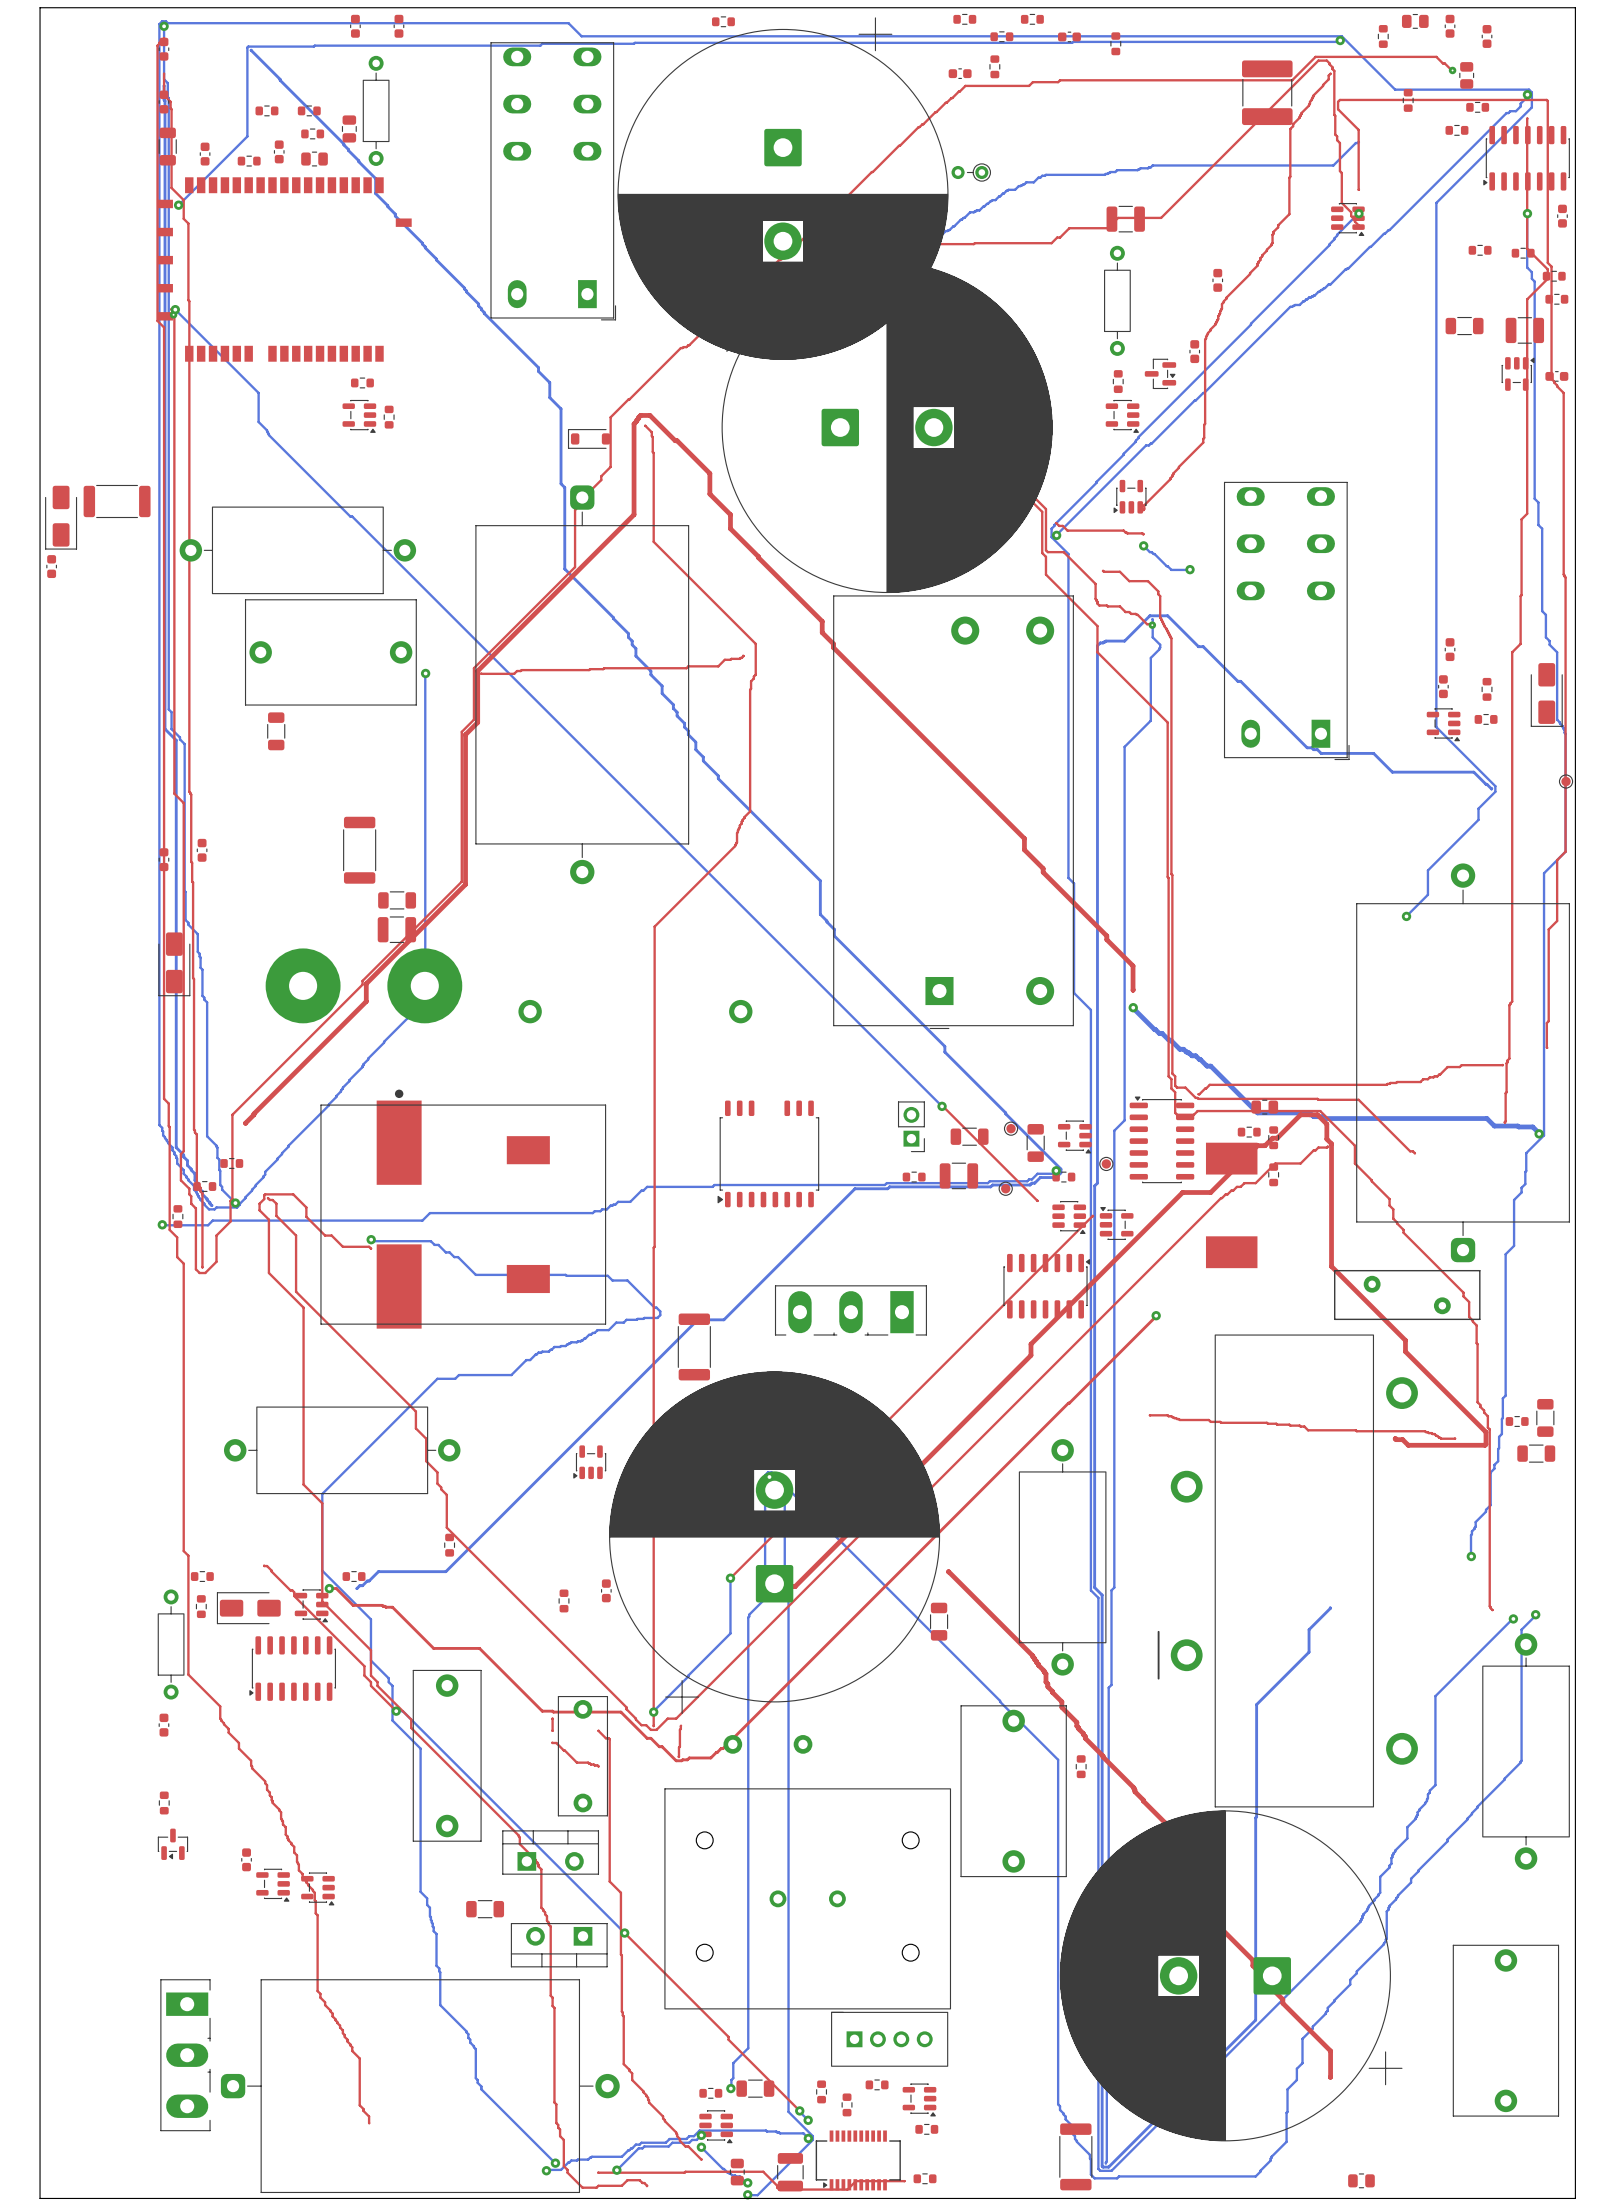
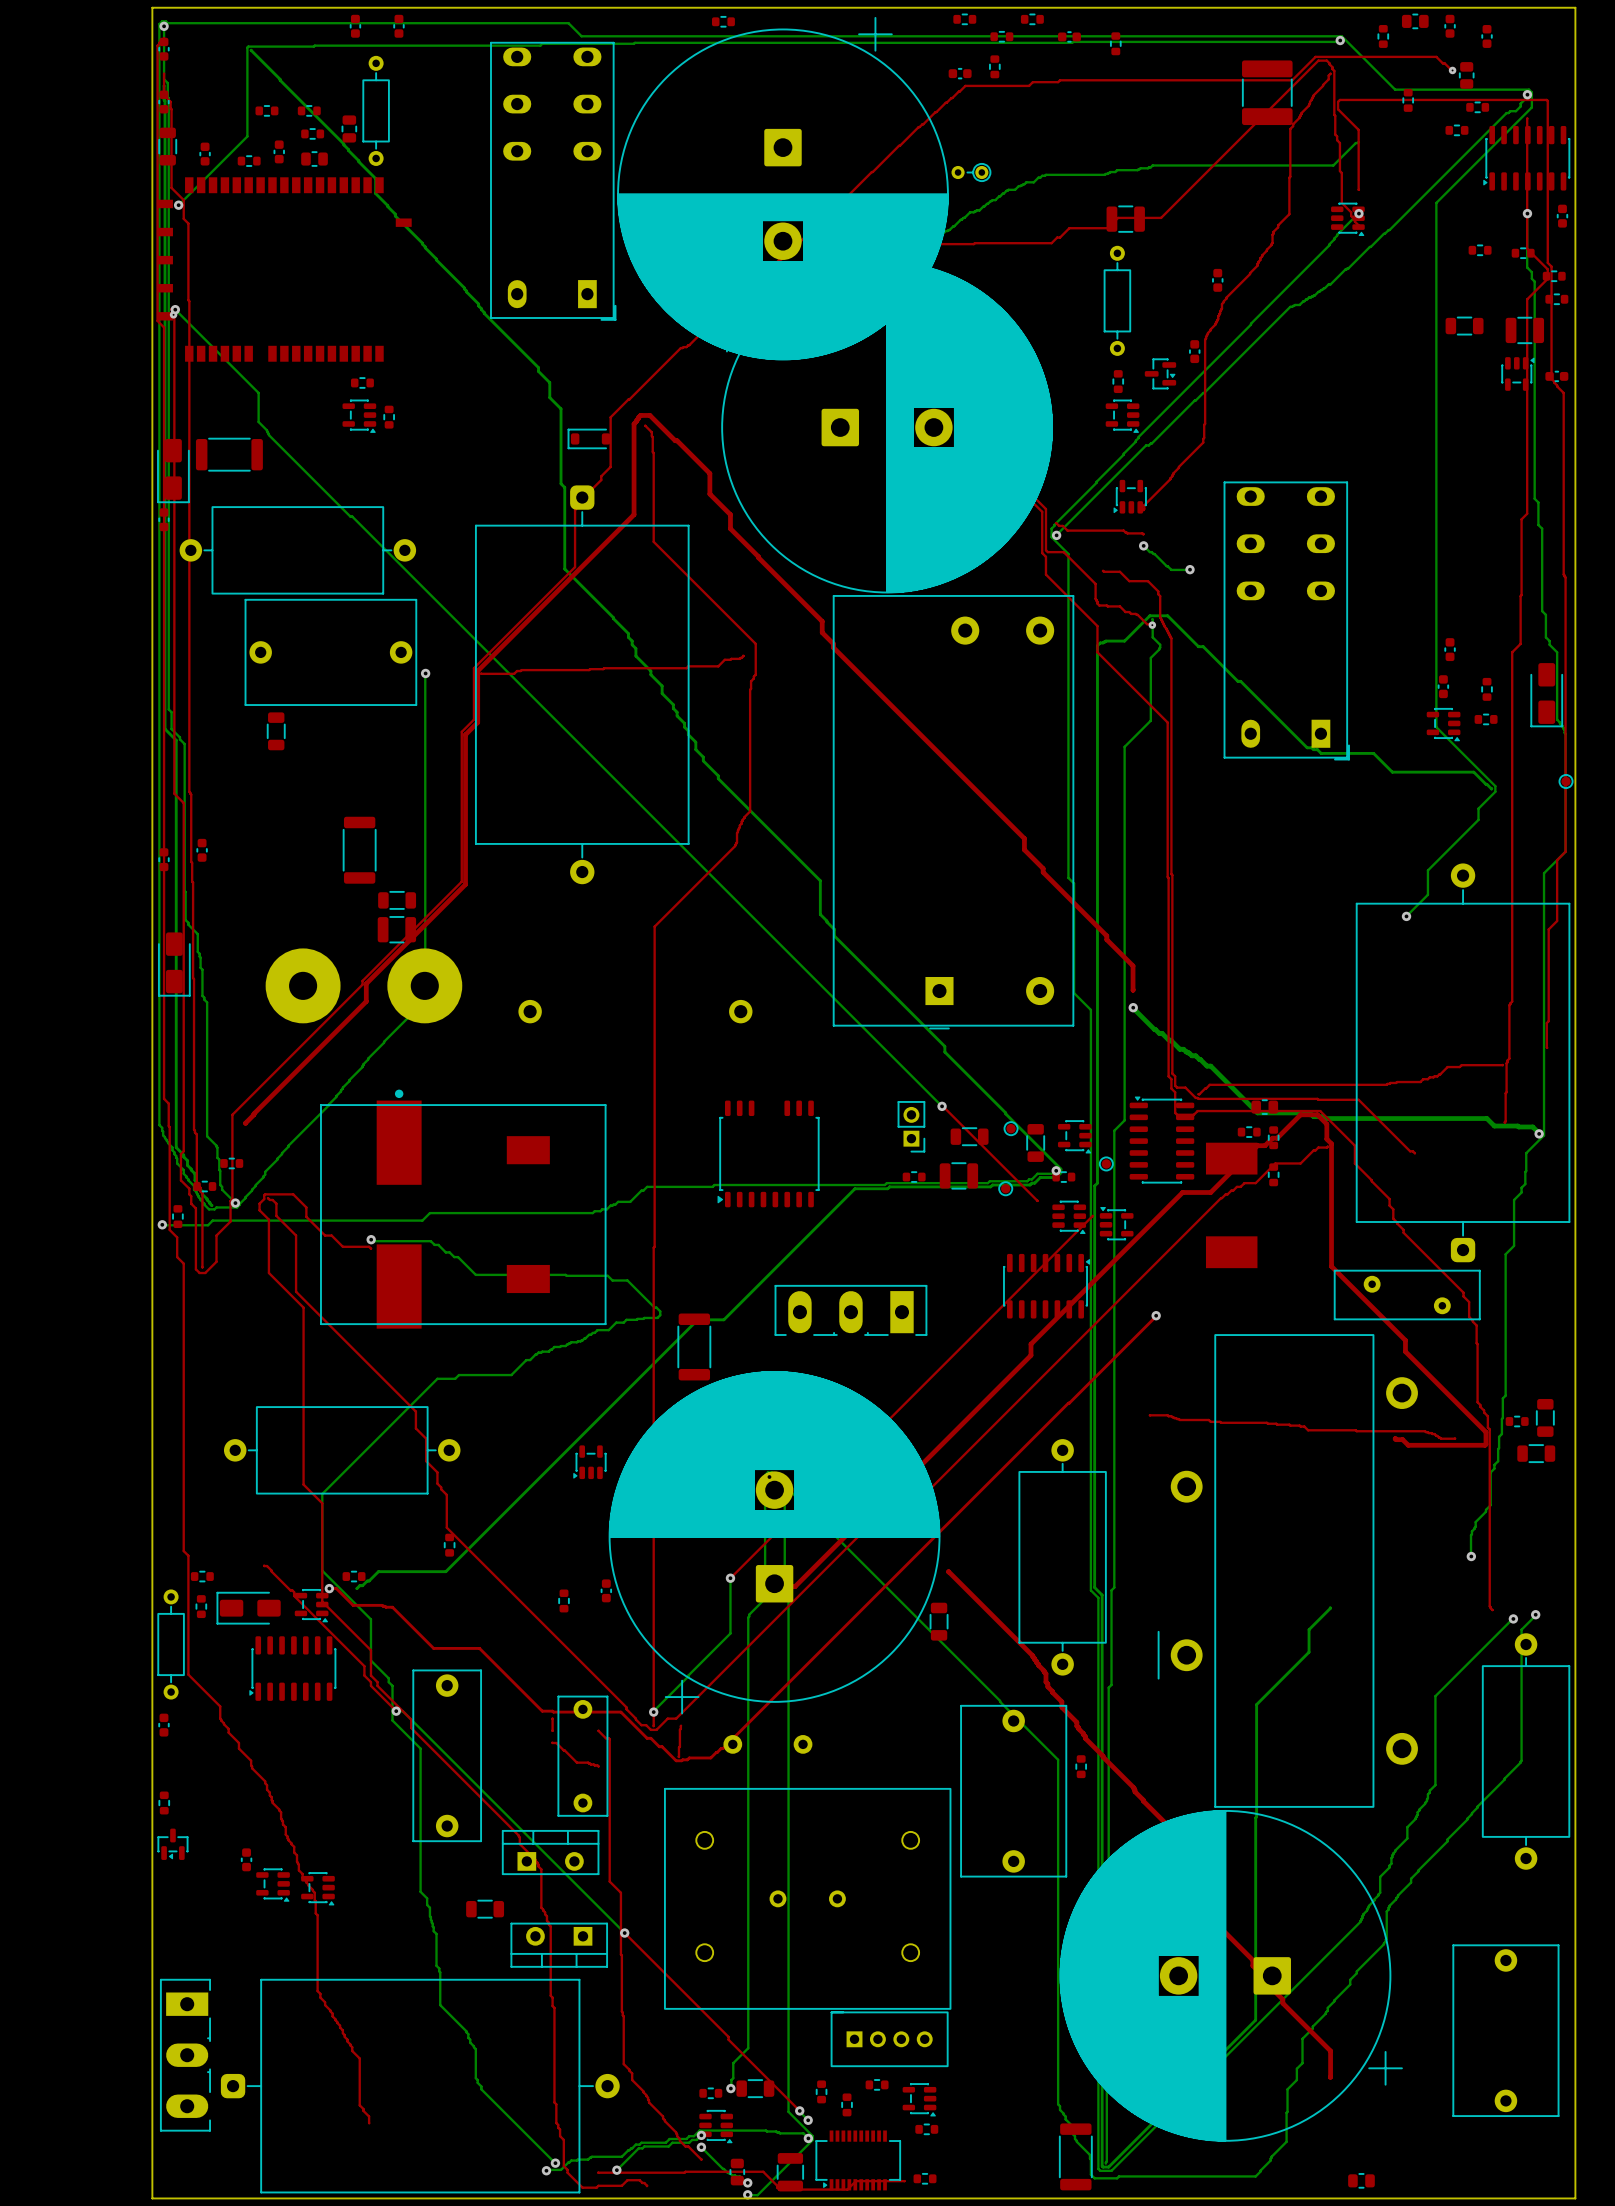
board edge: (152, 7) (40, 7) (40, 2198) (152, 2198) -> (152, 7) (152, 2198)
part position: (117, 501) -> (229, 454)
part position: (61, 517) -> (173, 470)
part position: (51, 566) -> (163, 519)

